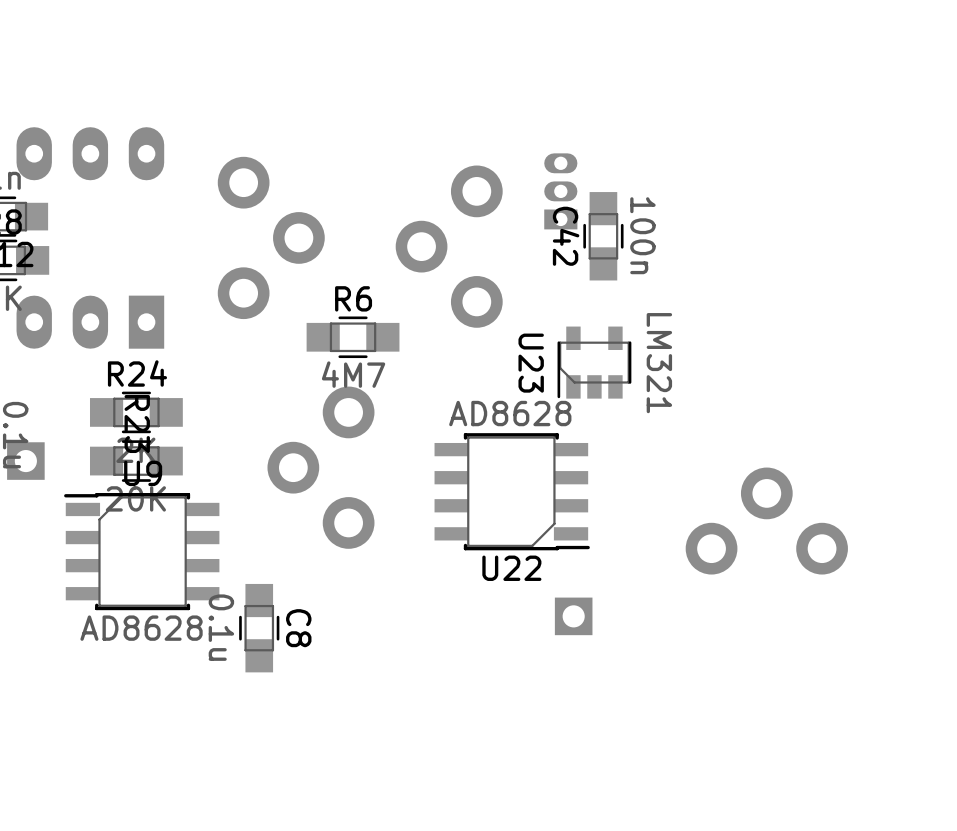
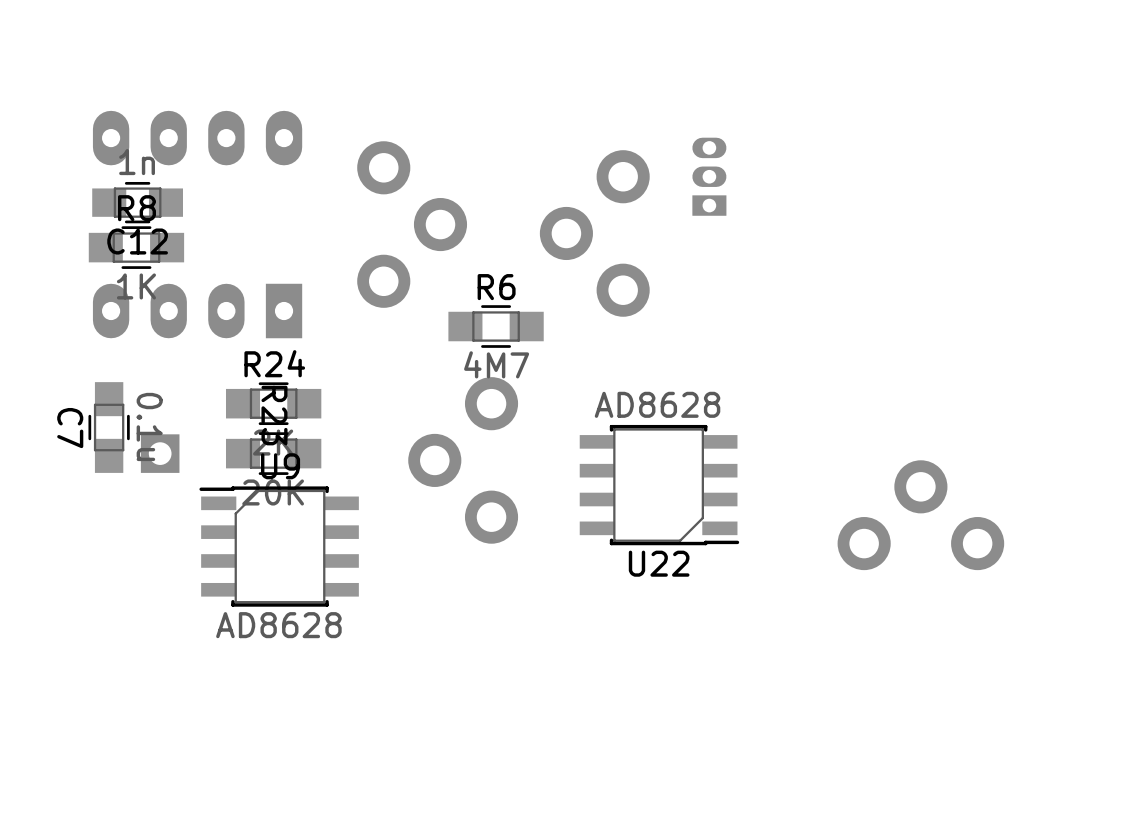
C42: 100n (603, 236) -> none
U23: LM321 (594, 362) -> none
part: (573, 616) -> none
C8: 0.1u (259, 628) -> none

